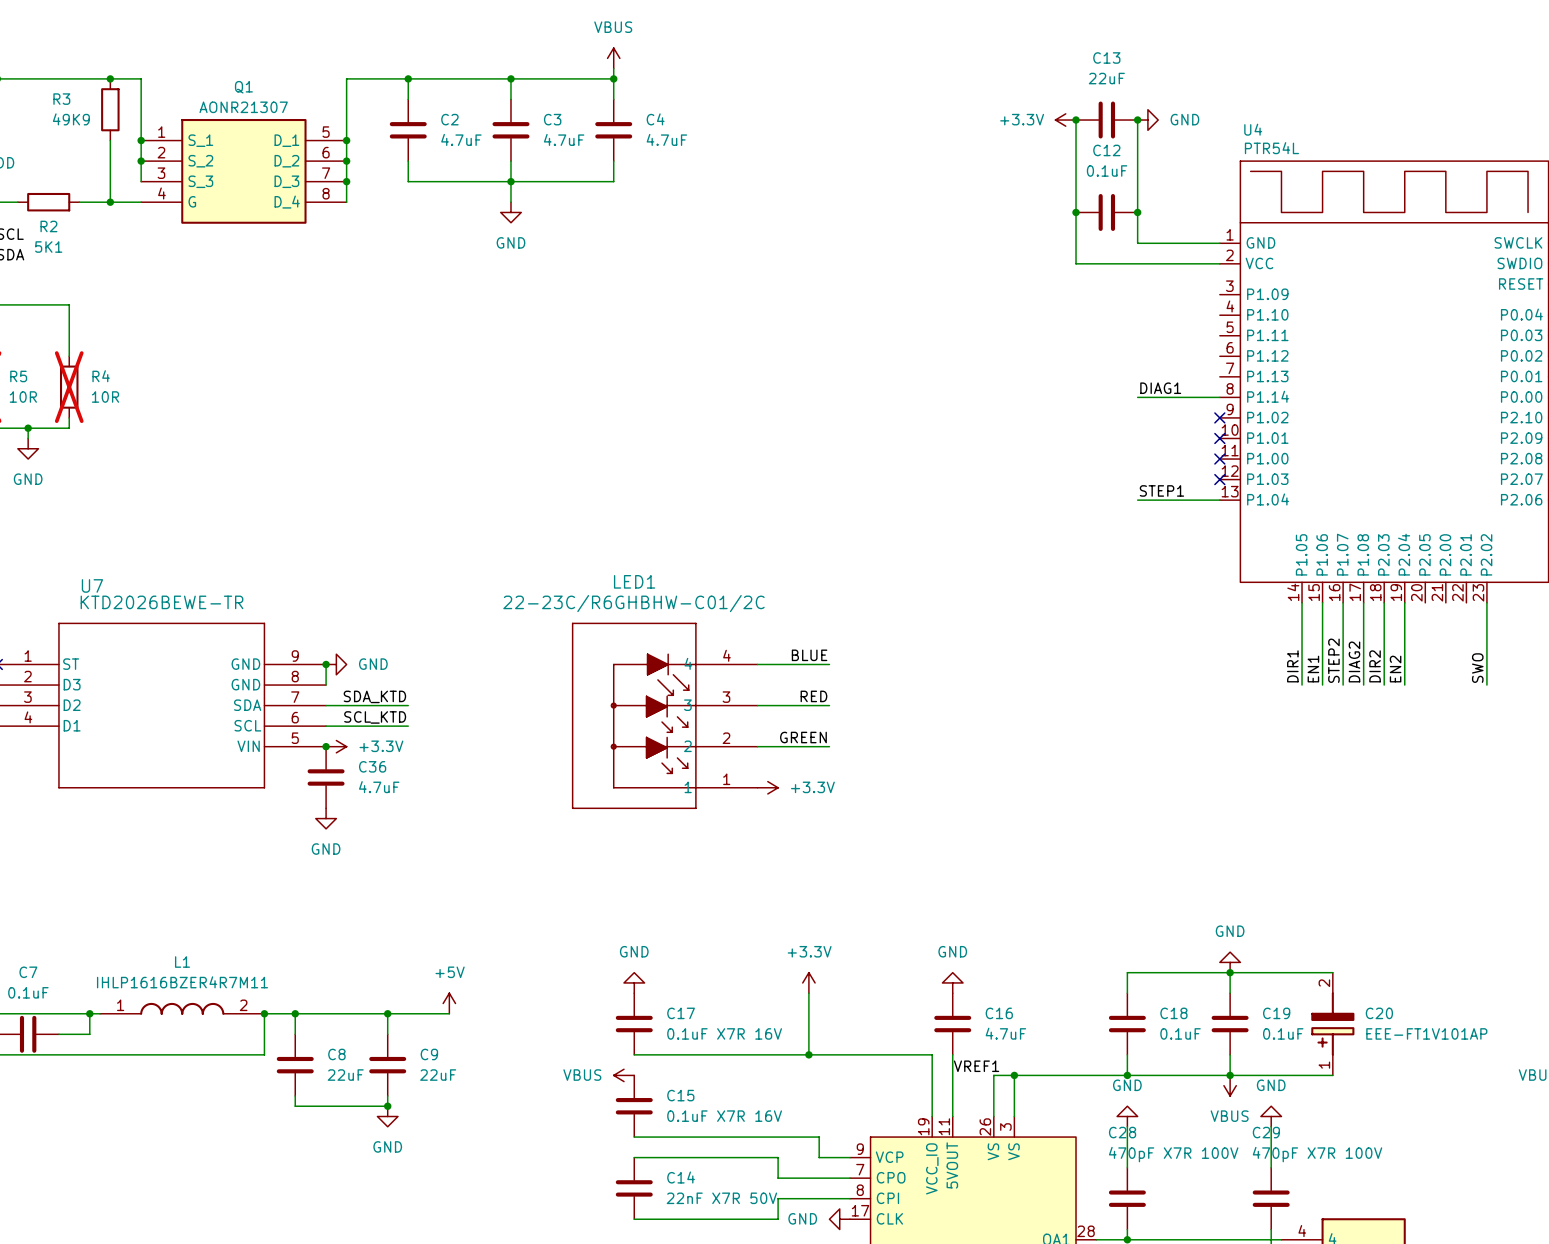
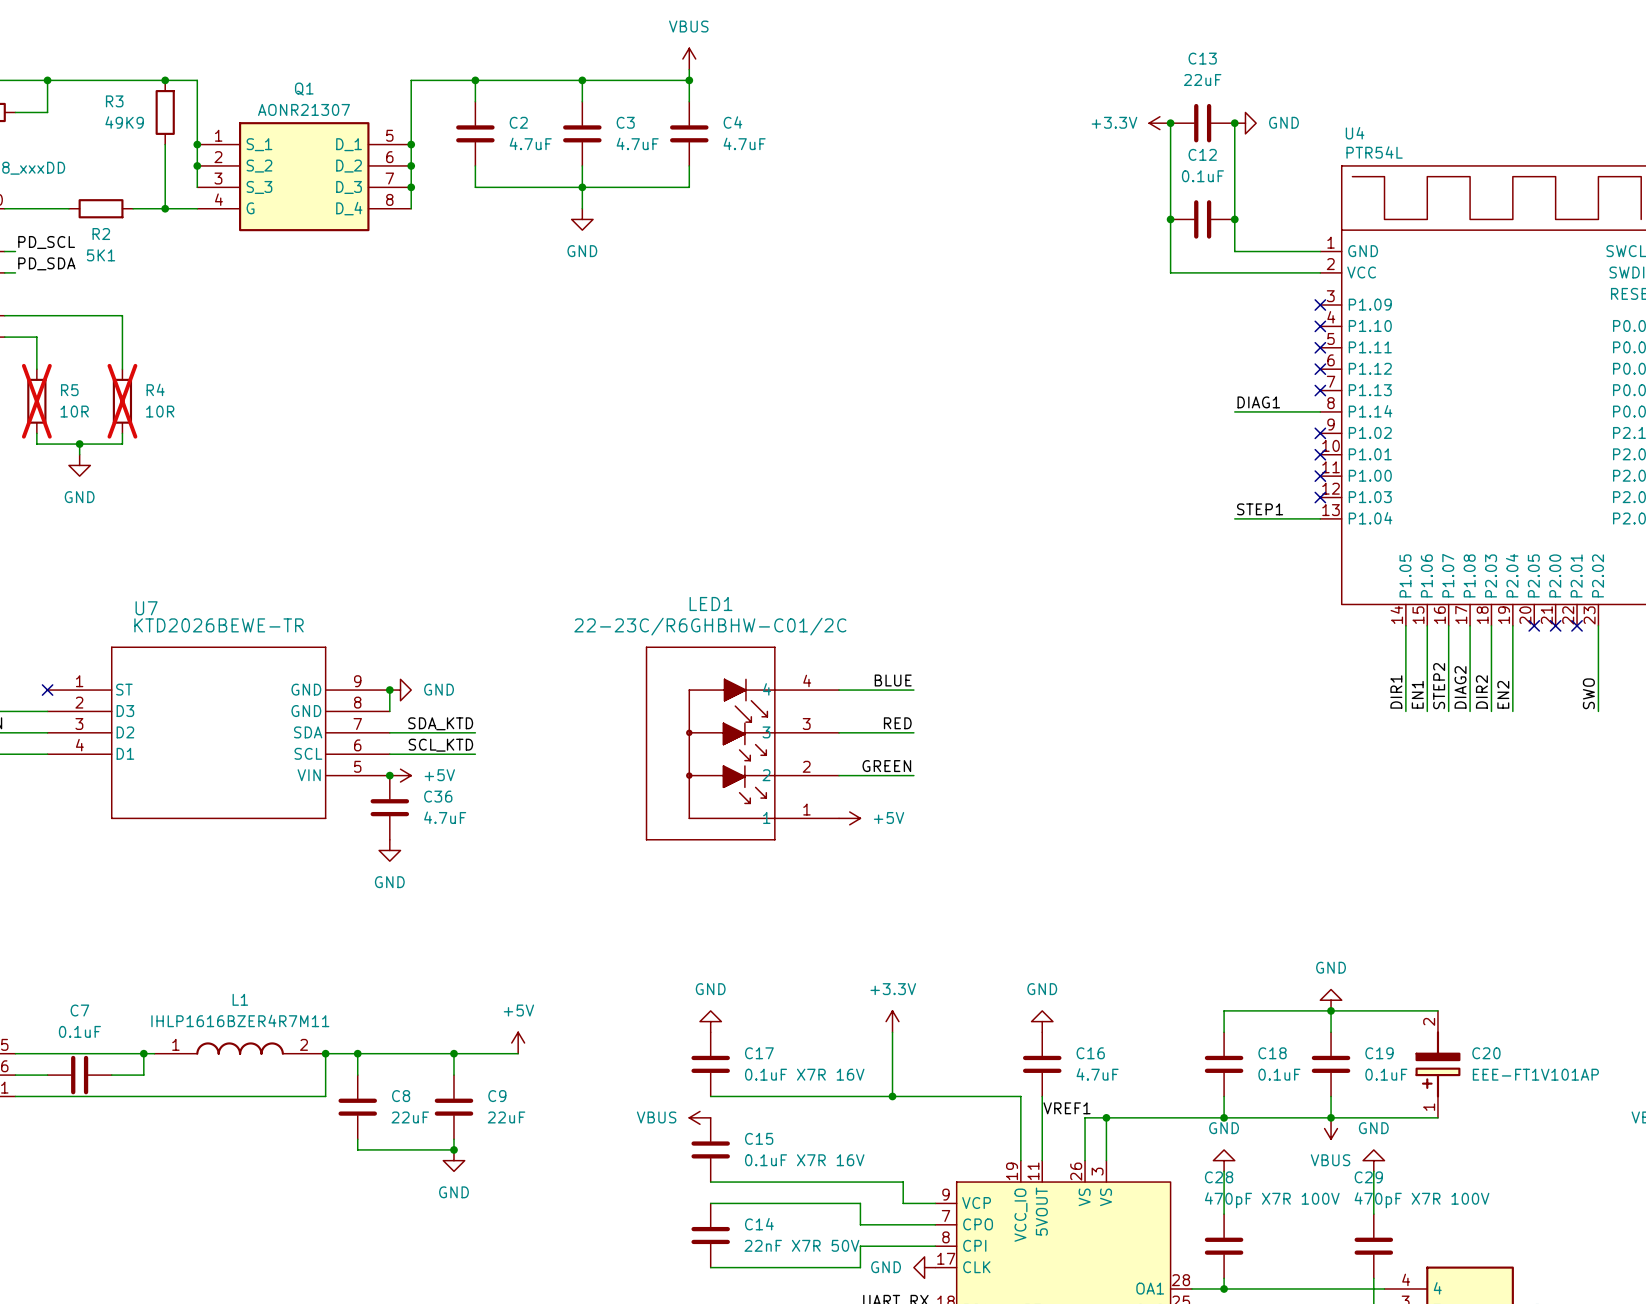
no-connect mark: none -> (1320, 305)
no-connect mark: none -> (1320, 326)
no-connect mark: none -> (1320, 347)
no-connect mark: none -> (1320, 369)
no-connect mark: none -> (1320, 390)
no-connect mark: none -> (1534, 625)
no-connect mark: none -> (1555, 625)
no-connect mark: none -> (1577, 625)
power symbol: +3.3V (336, 746) -> +5V (400, 775)
power symbol: +3.3V (767, 787) -> +5V (849, 818)

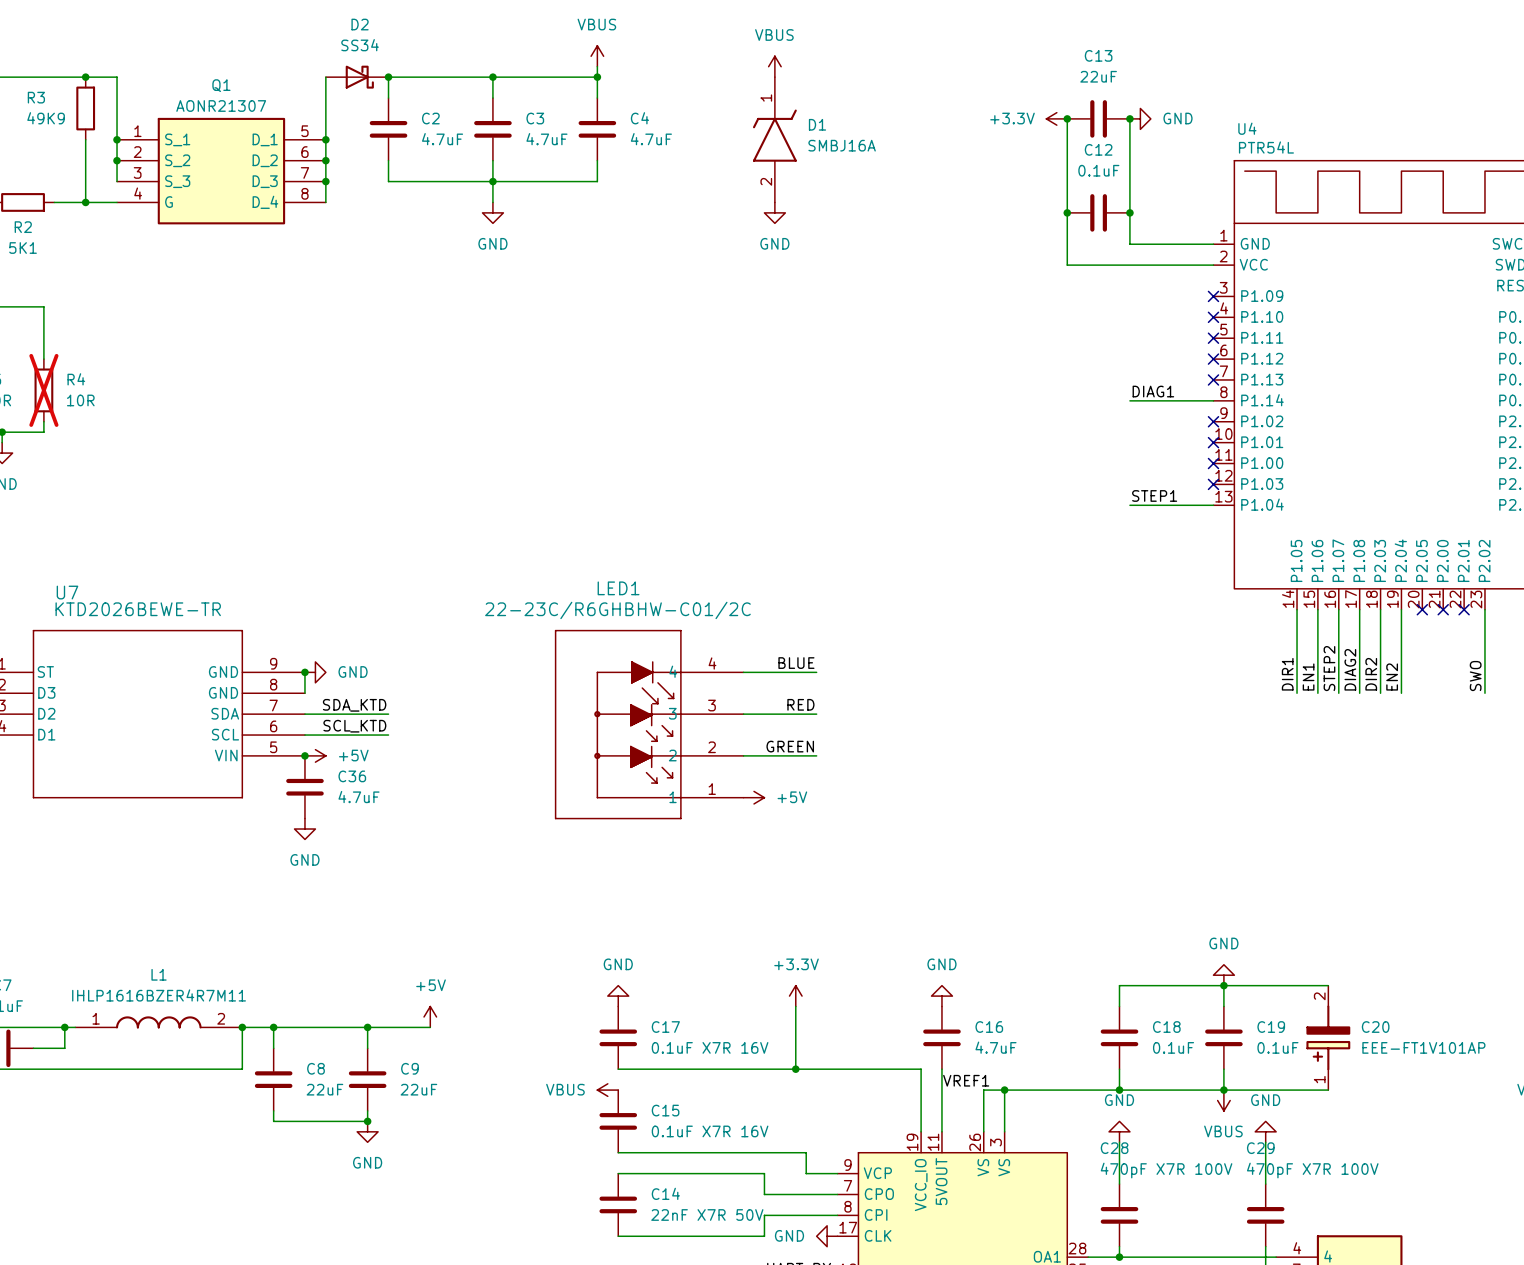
power symbol: none -> VBUS (774, 66)
D2: none -> SS34 (357, 77)
D1: none -> SMBJ16A (774, 139)
power symbol: none -> GND (774, 212)

